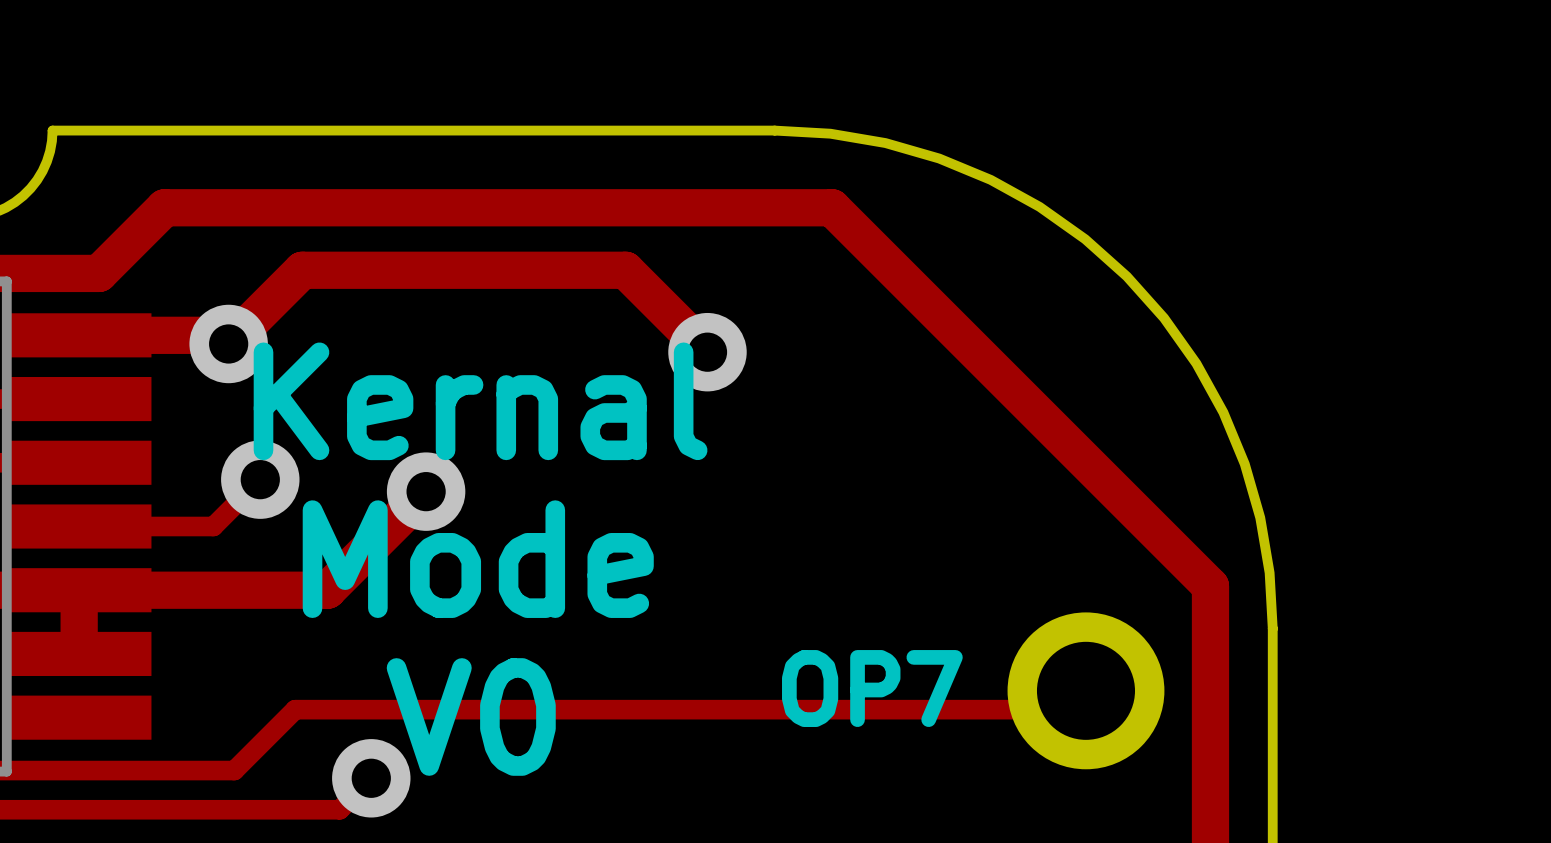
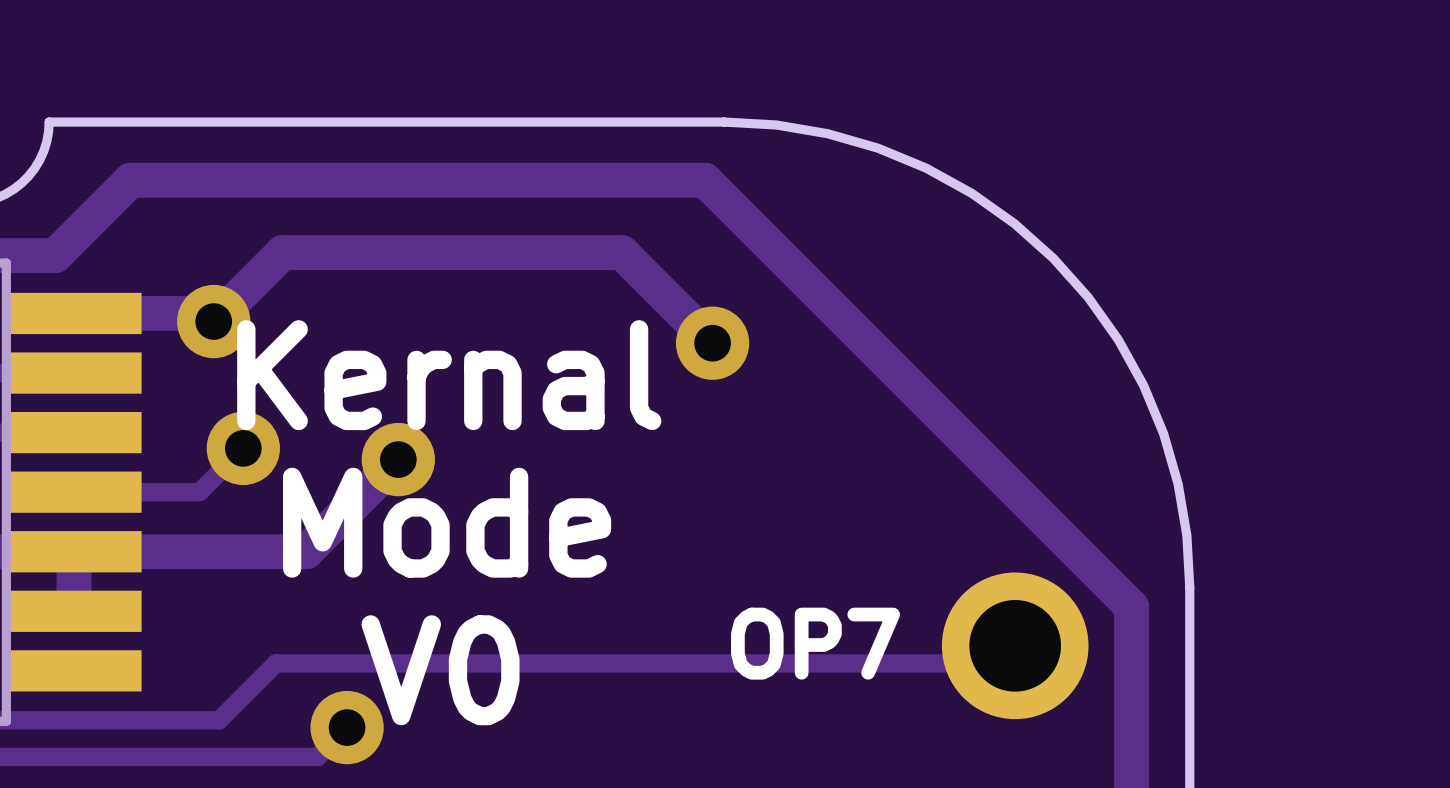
track: (625, 270) (707, 352) -> (584, 252) (622, 252) (712, 343)
track: (59, 273) (98, 273) (164, 207) (831, 207) (1210, 586) (1210, 649) -> (55, 255) (130, 180) (704, 180) (1131, 606)
via position: (707, 352) -> (712, 343)

